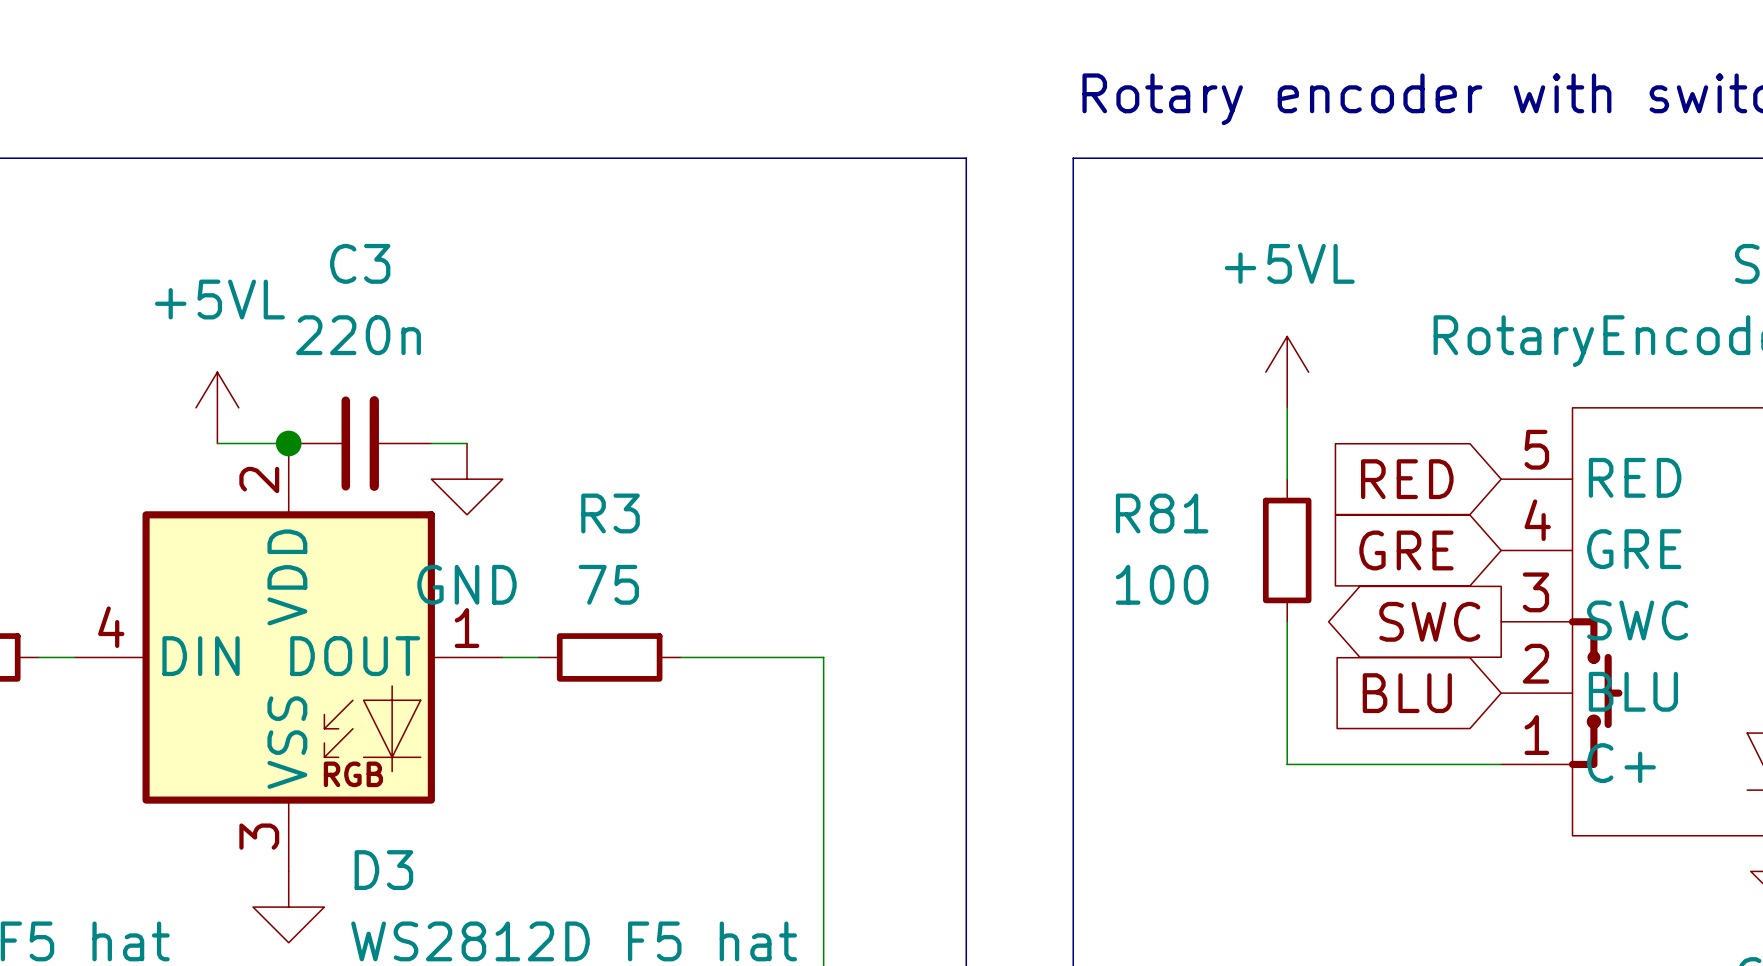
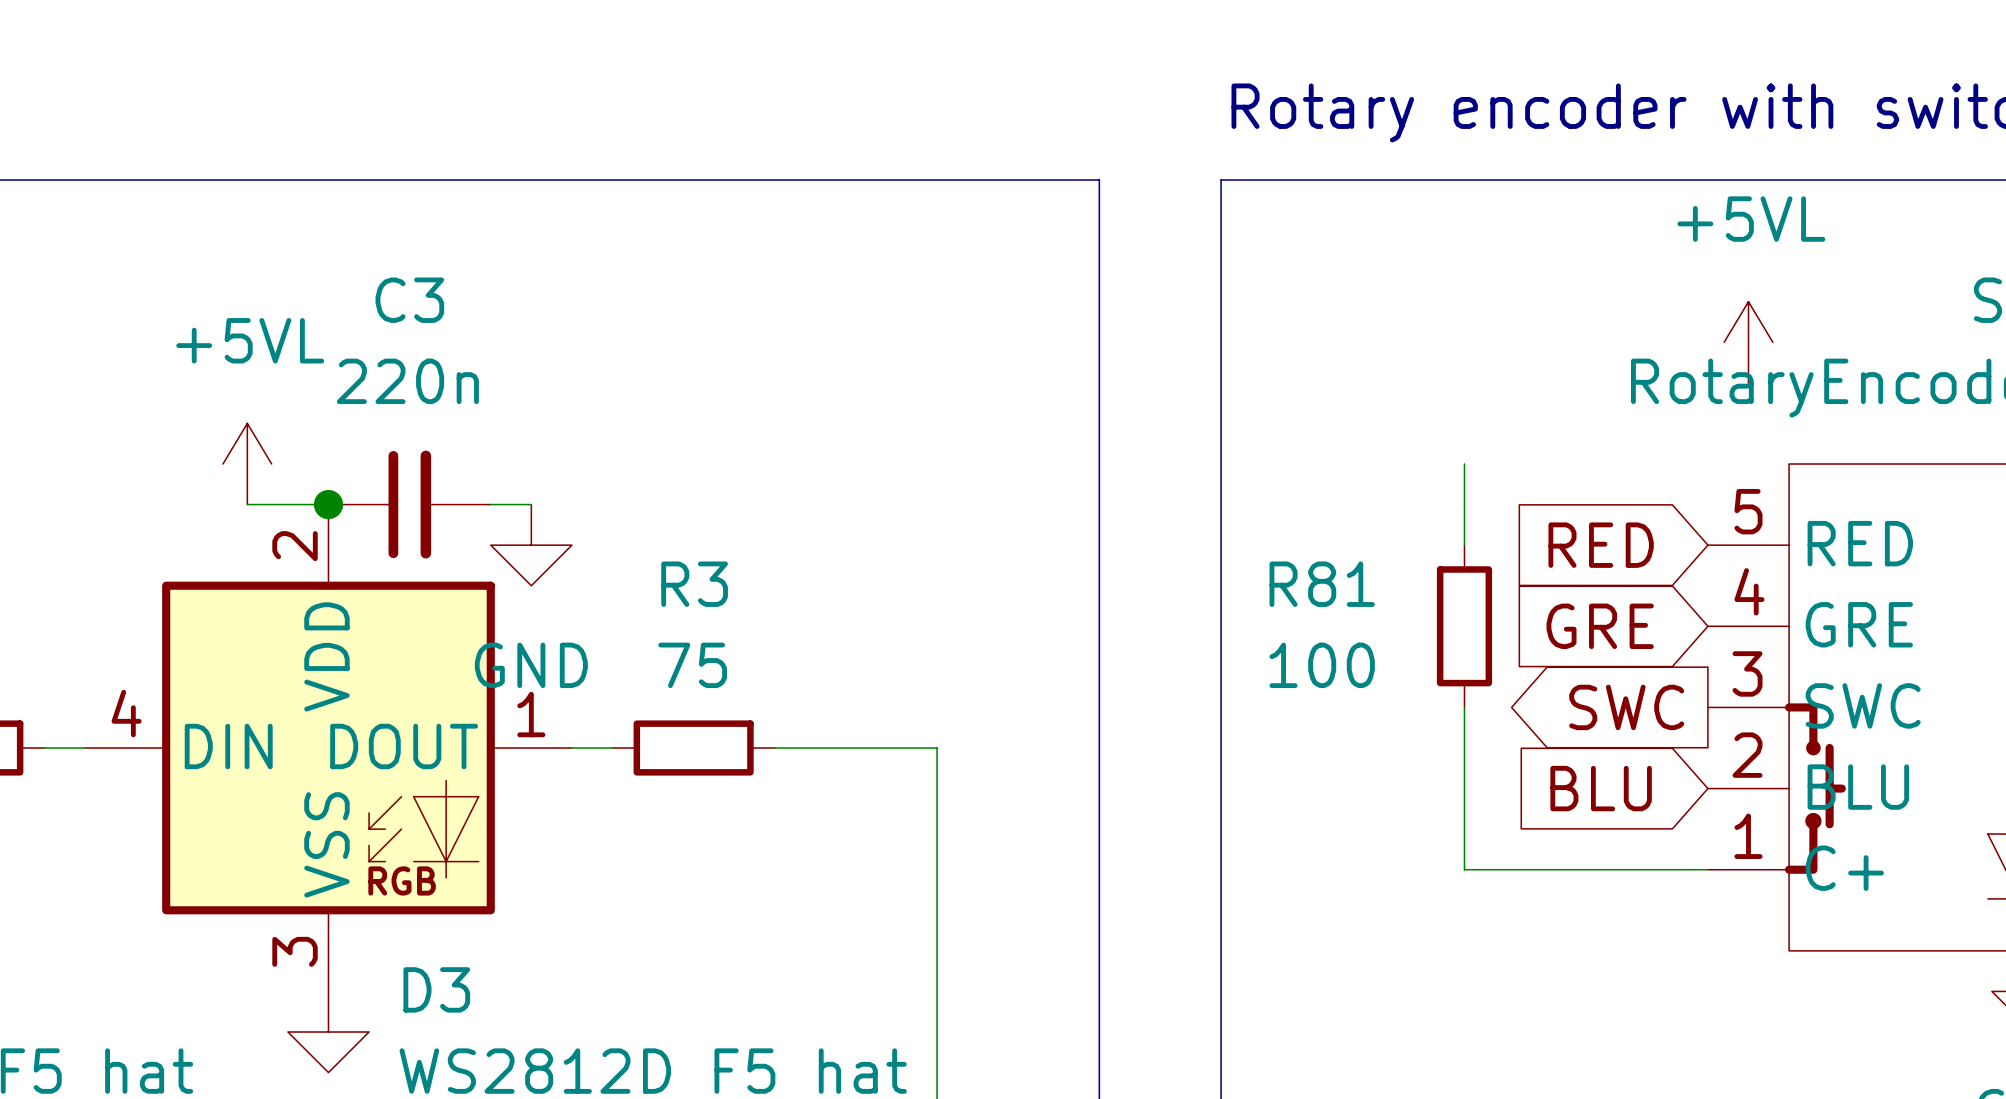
power symbol position: +5VL (1287, 372) -> +5VL (1748, 342)

